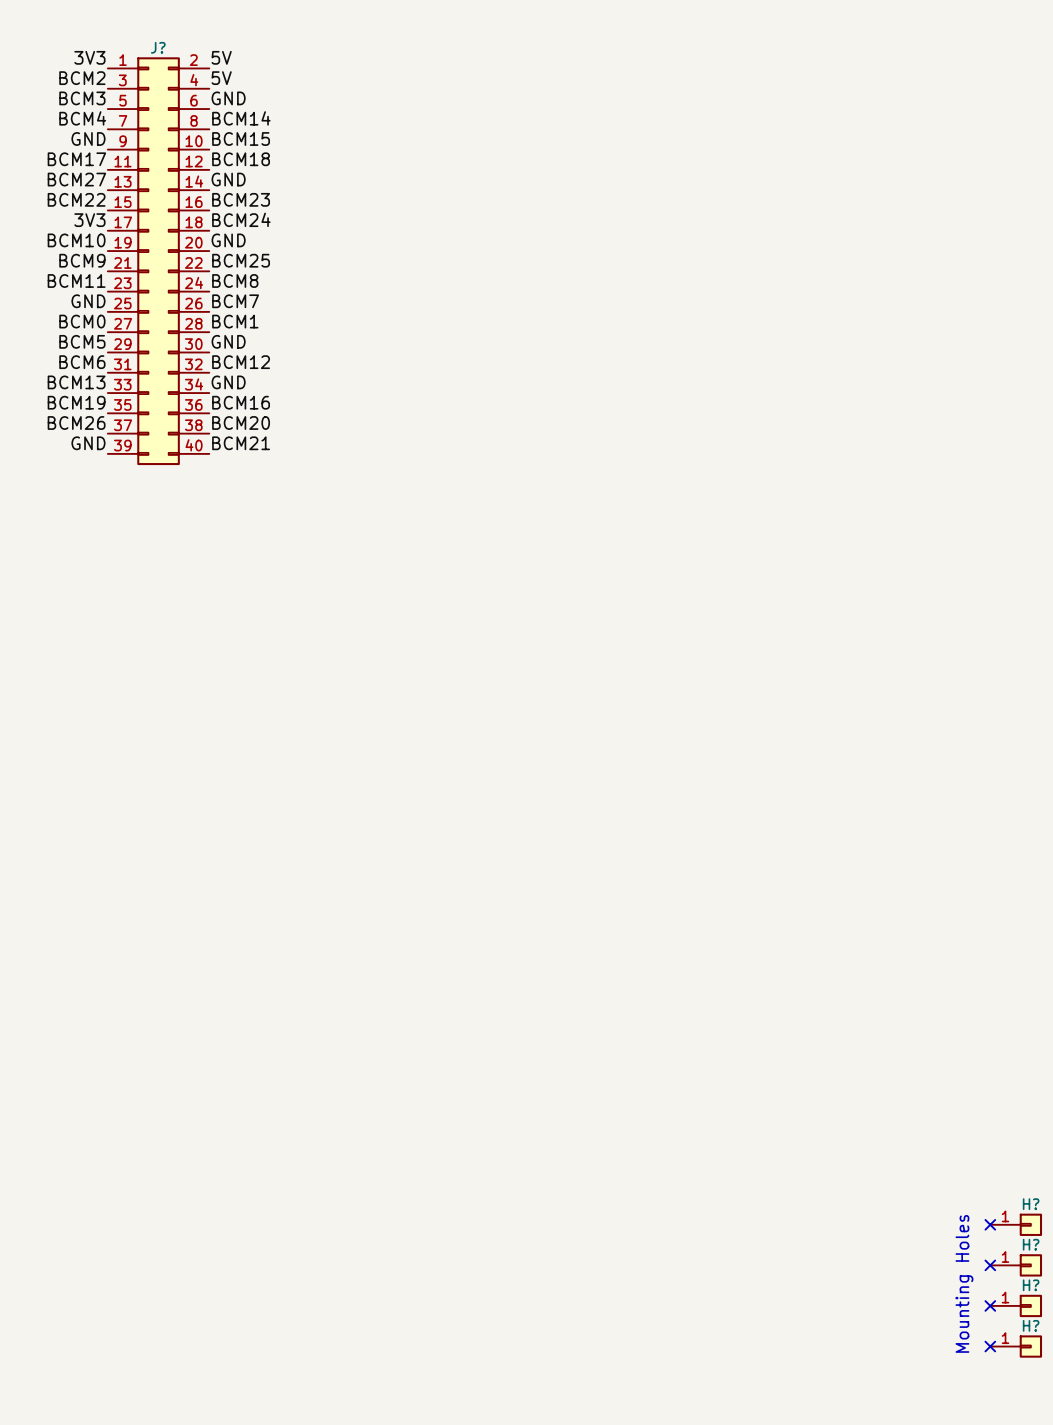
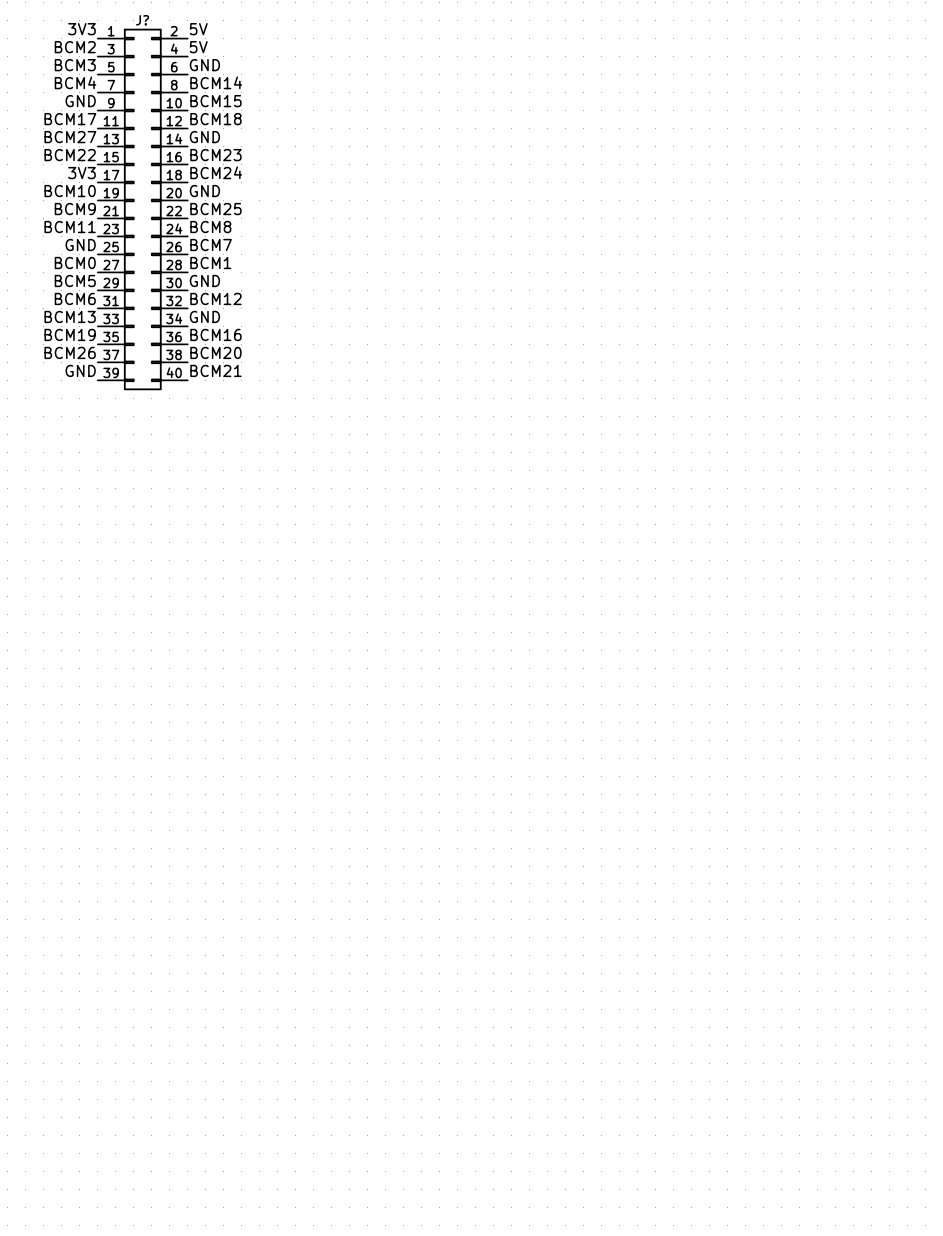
no-connect mark: (990, 1224) -> none
H?: (1016, 1224) -> none
no-connect mark: (990, 1265) -> none
H?: (1016, 1265) -> none
text: Mounting Holes (964, 1283) -> none
no-connect mark: (990, 1305) -> none
H?: (1016, 1305) -> none
no-connect mark: (990, 1346) -> none
H?: (1016, 1346) -> none

